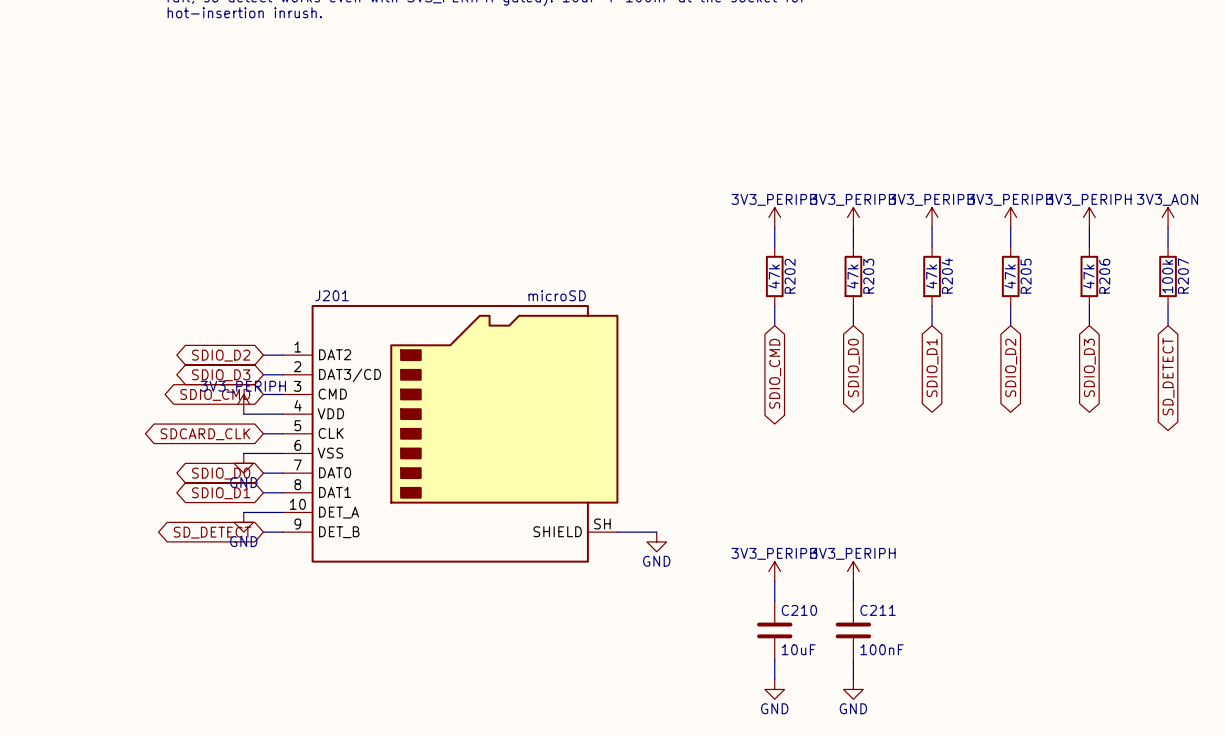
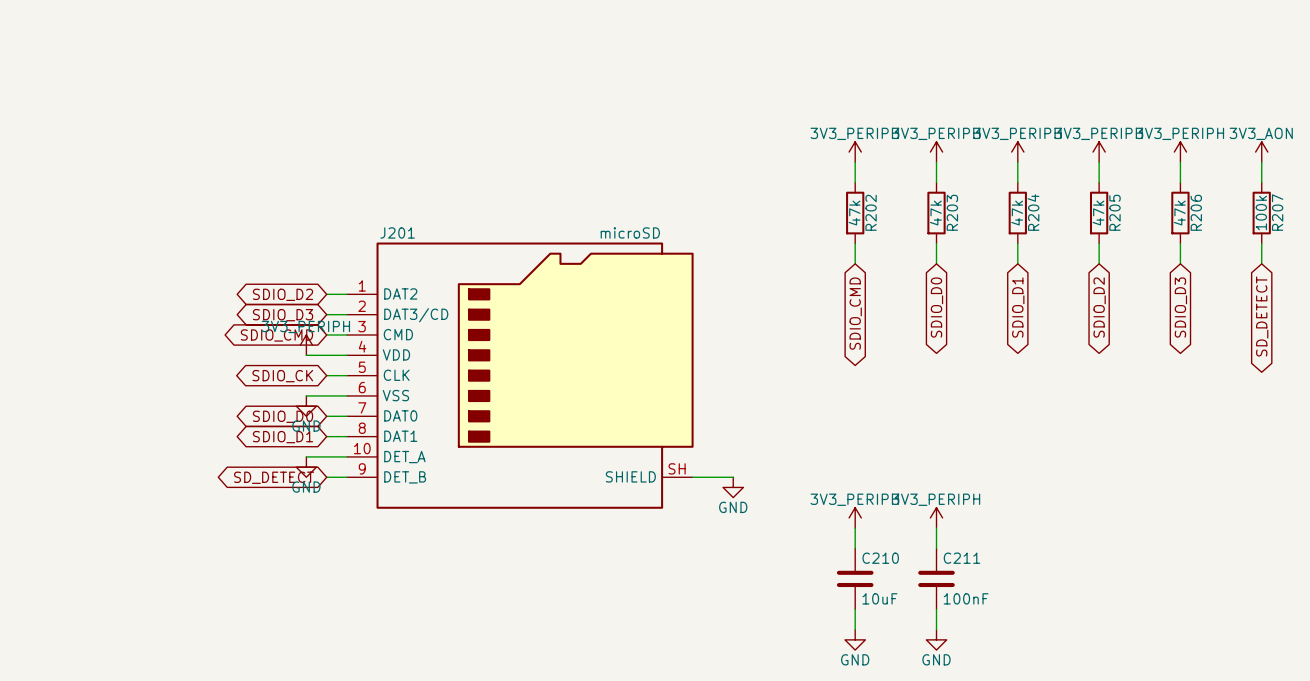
global label: SDCARD_CLK (205, 434) -> SDIO_CK (282, 376)

